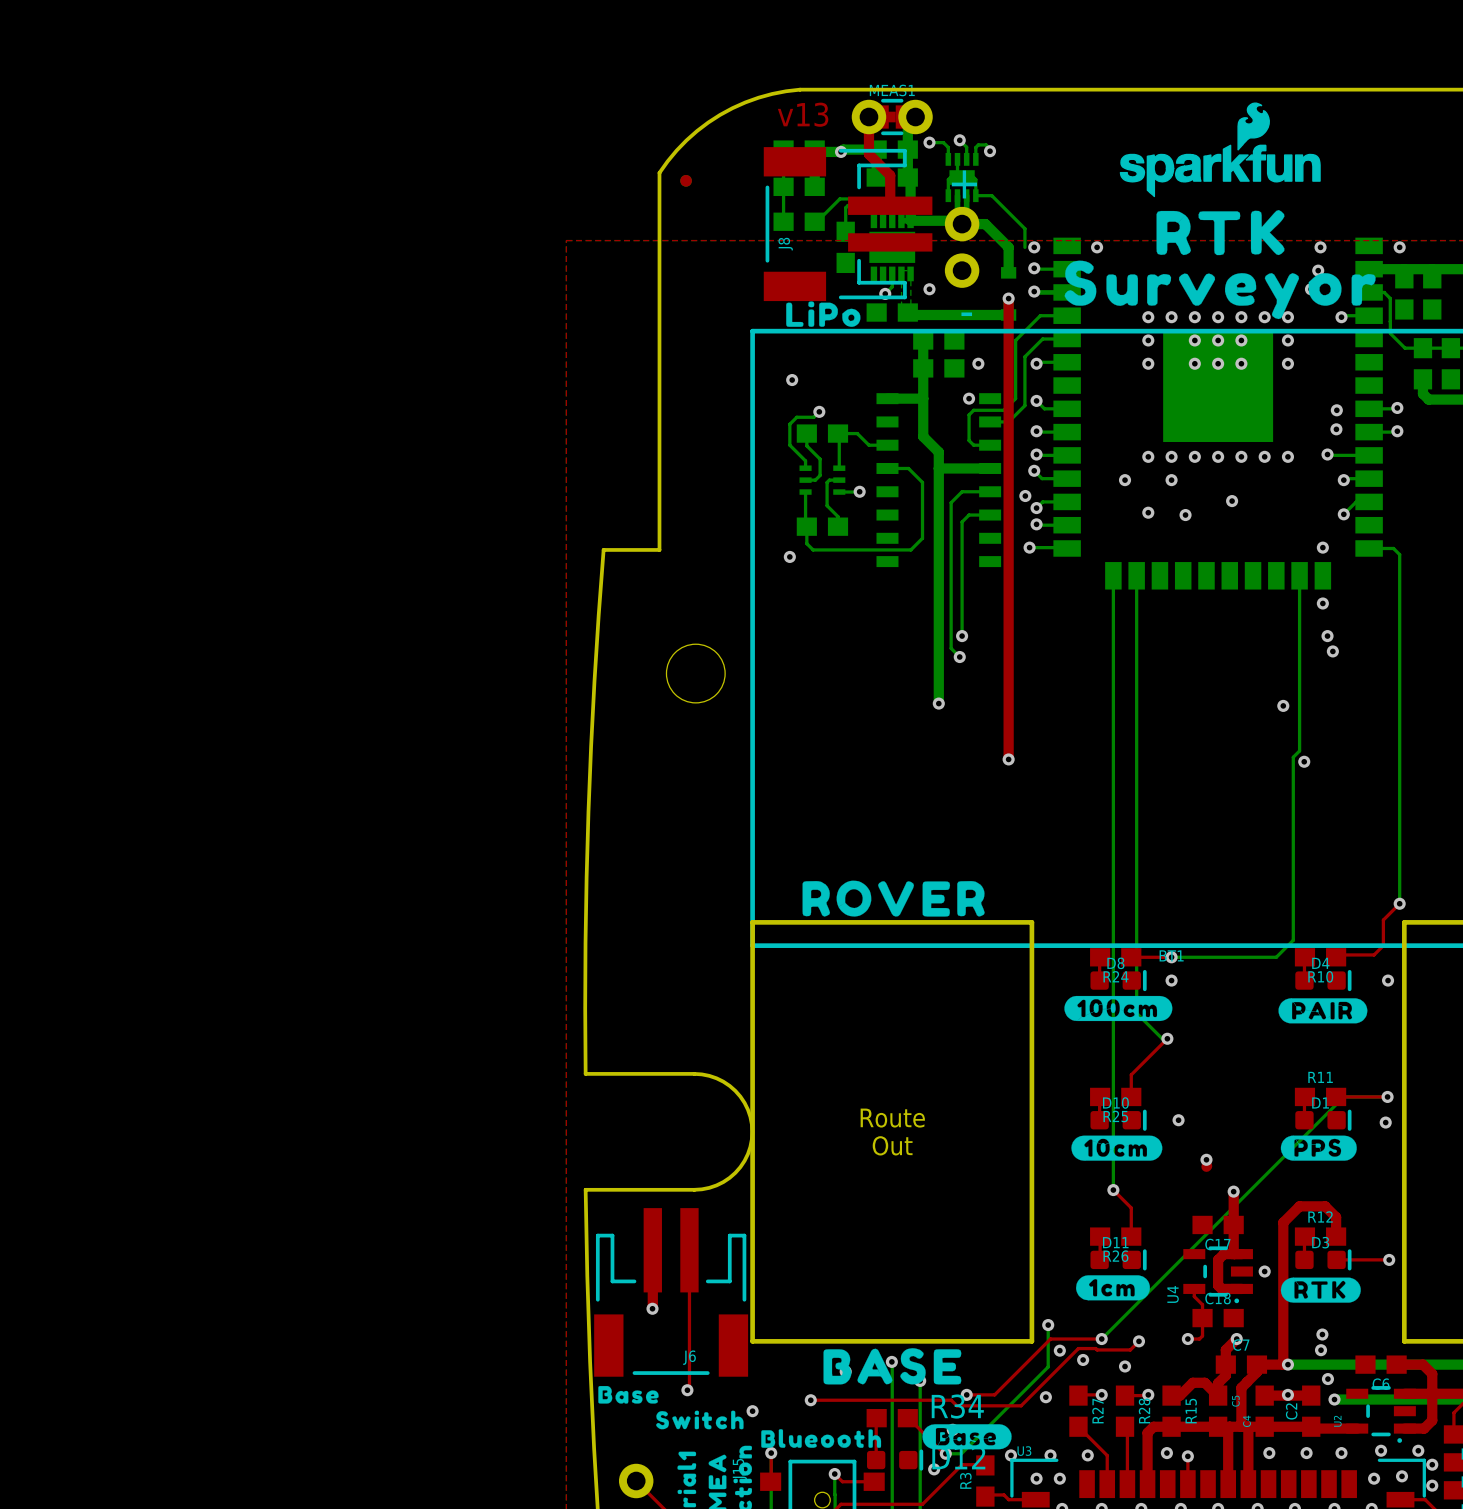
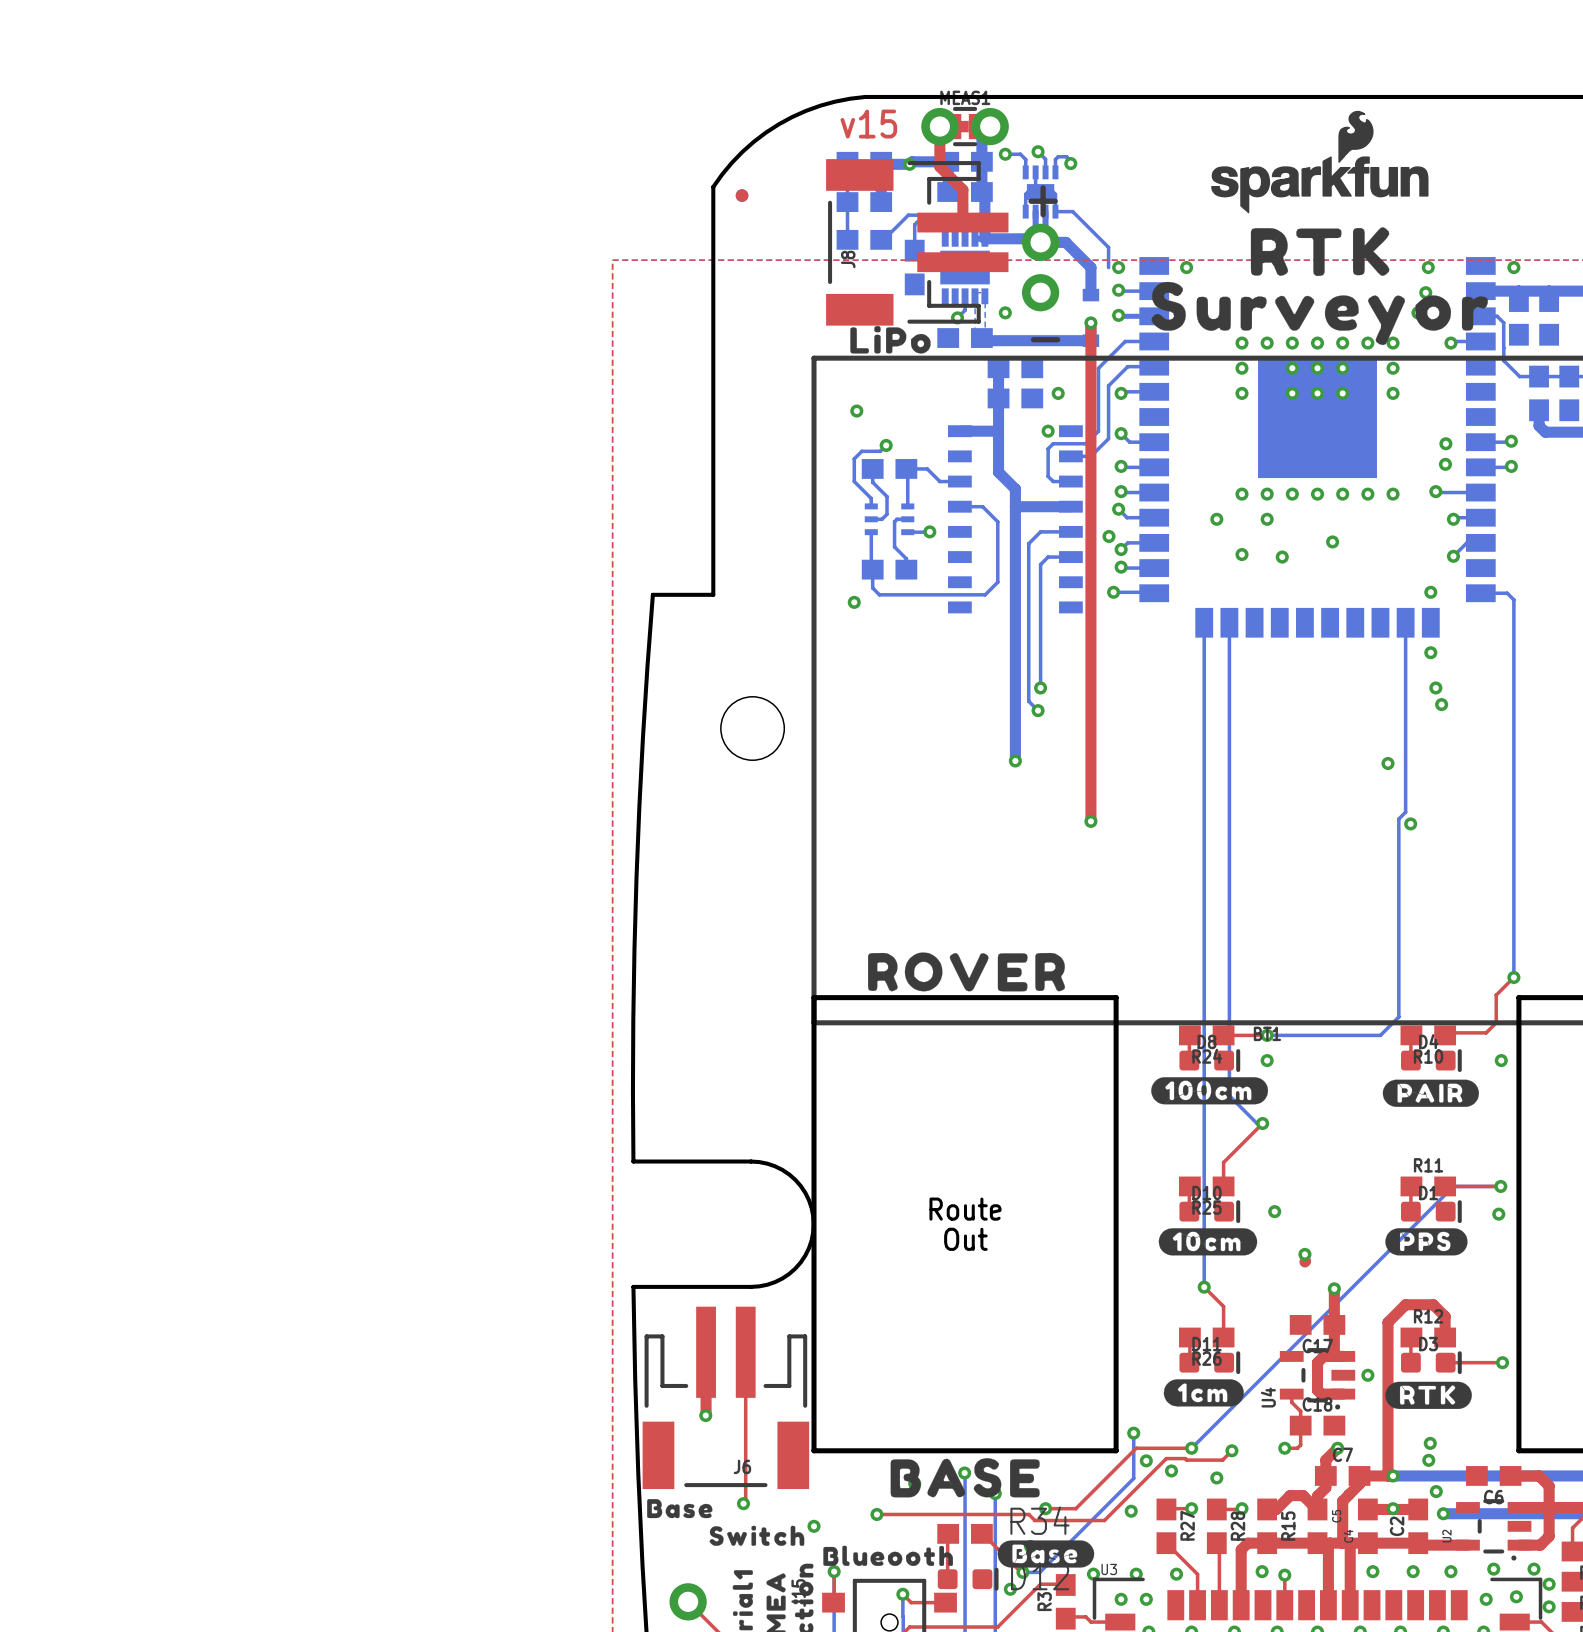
text: v13 (803, 114) -> v15 (868, 124)

